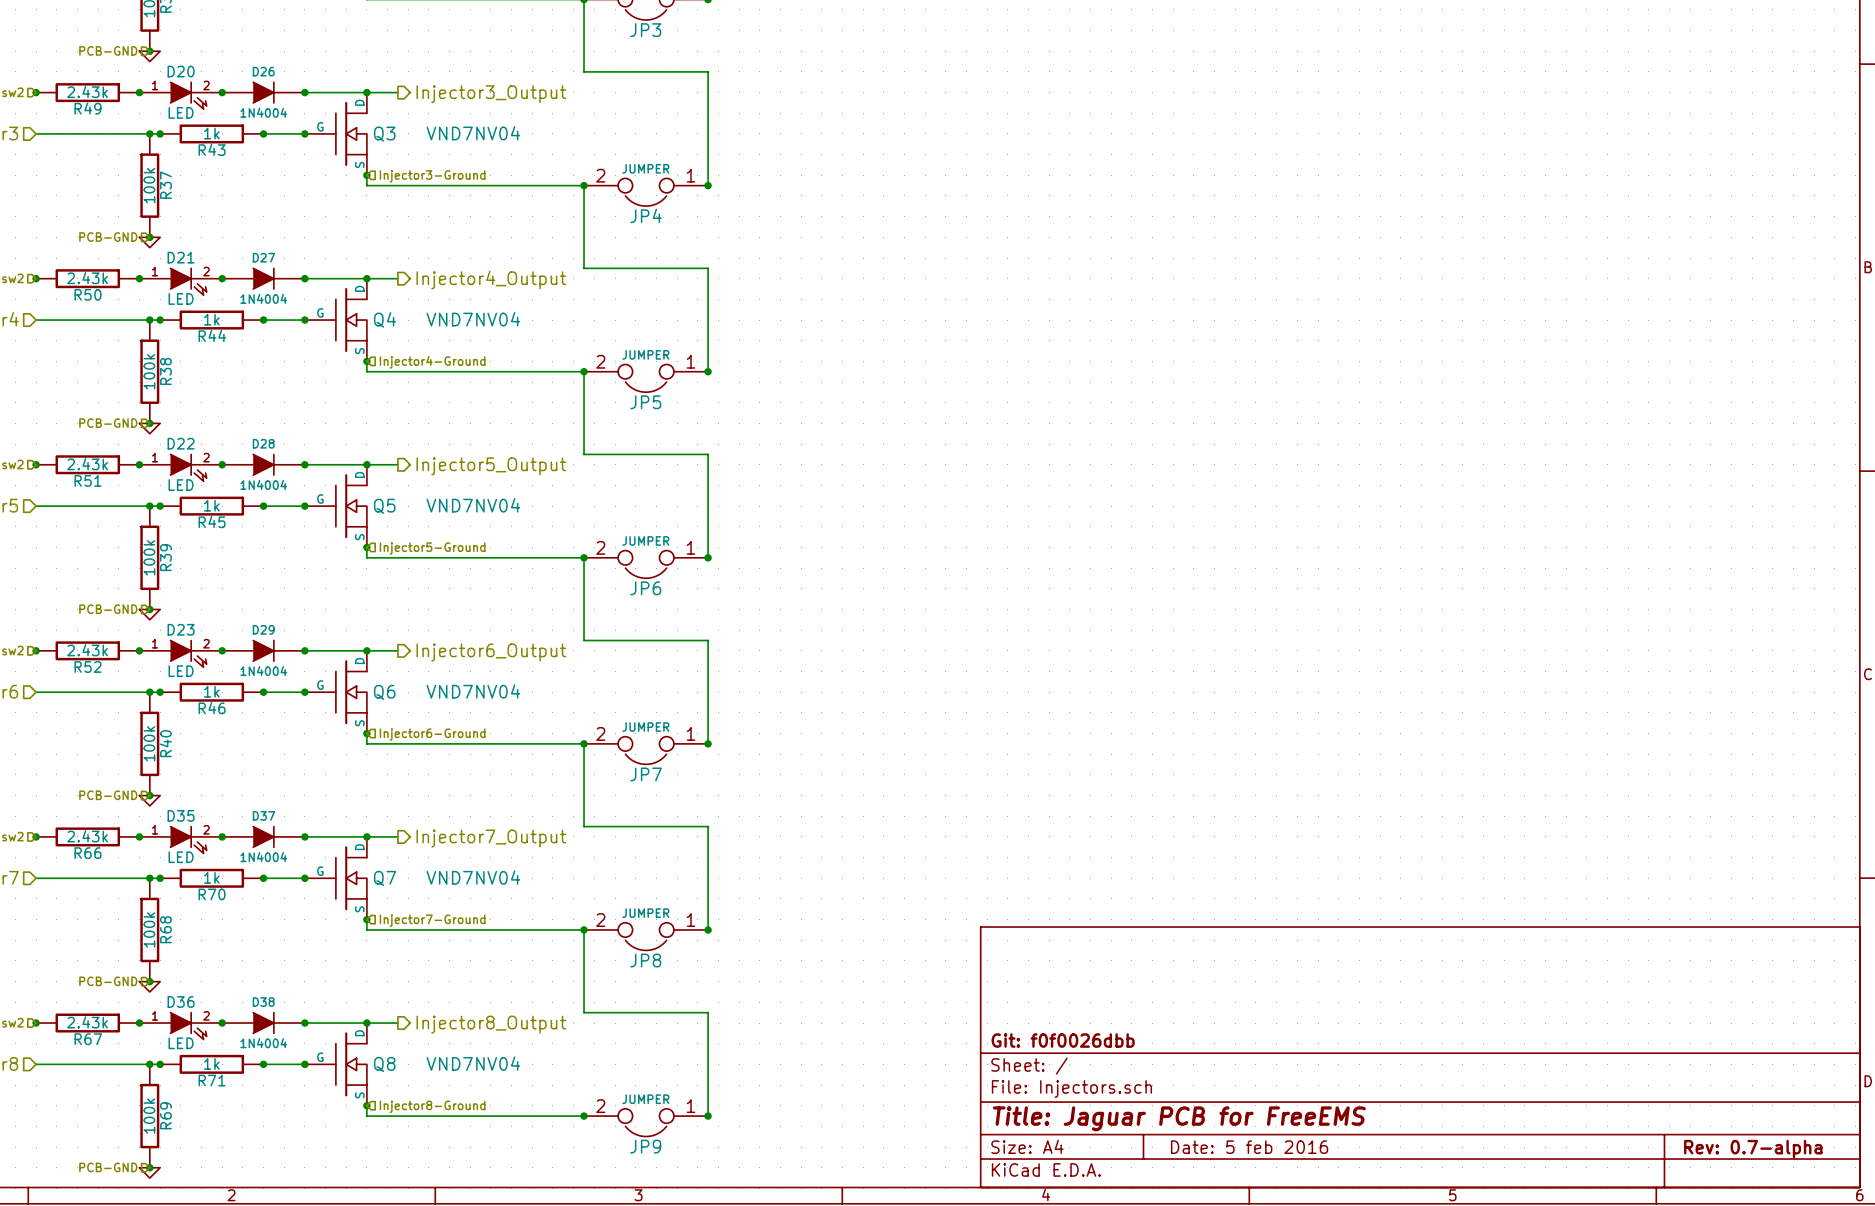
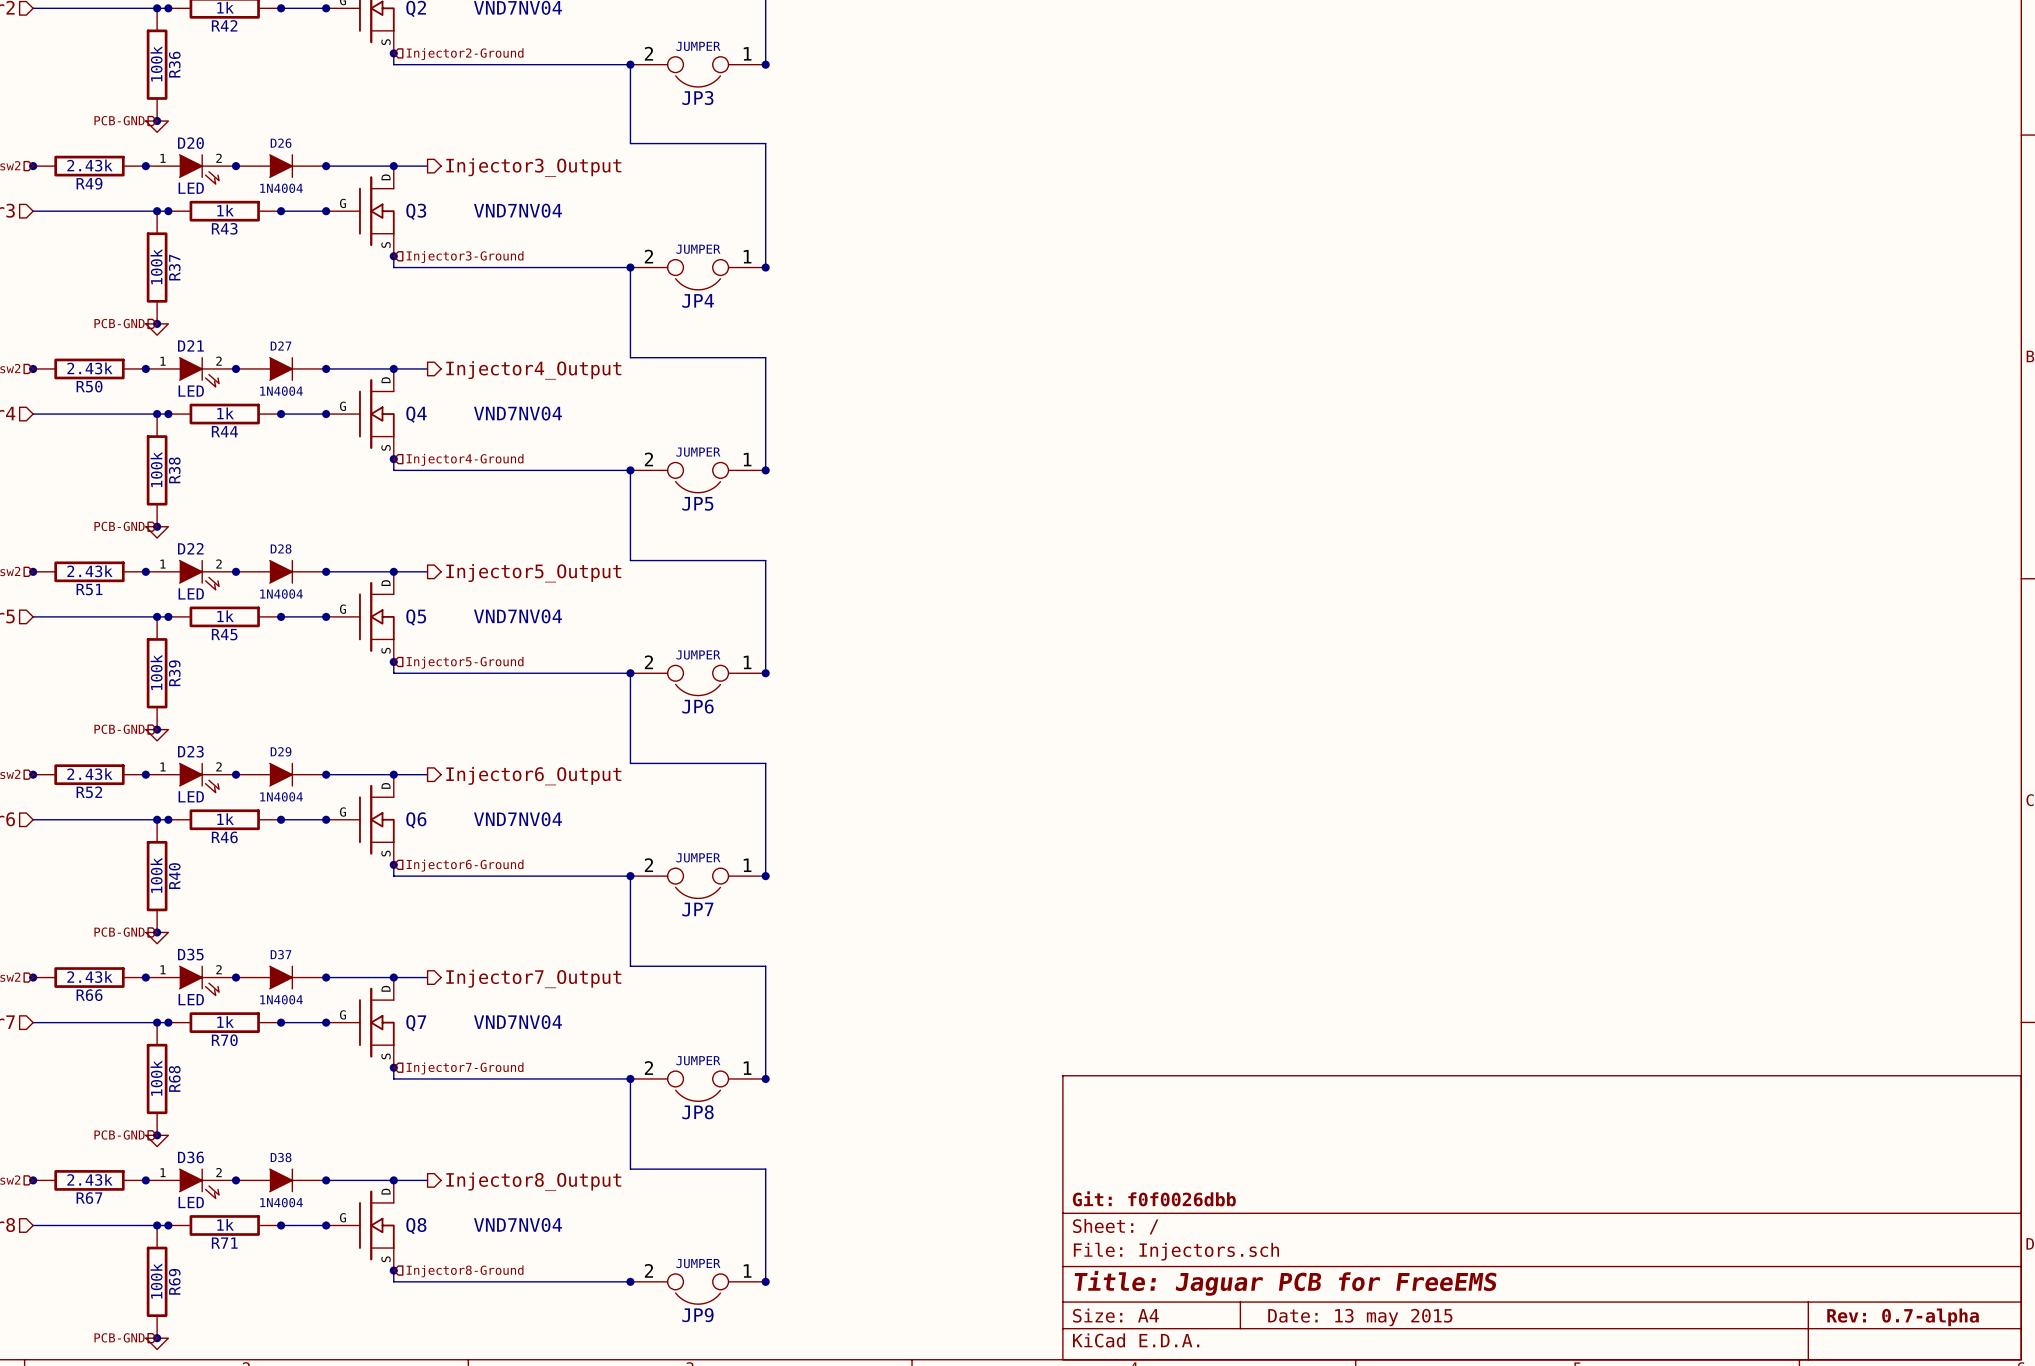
title block: Date: 5 feb 2016 (1249, 1147) -> Date: 13 may 2015 (1360, 1317)

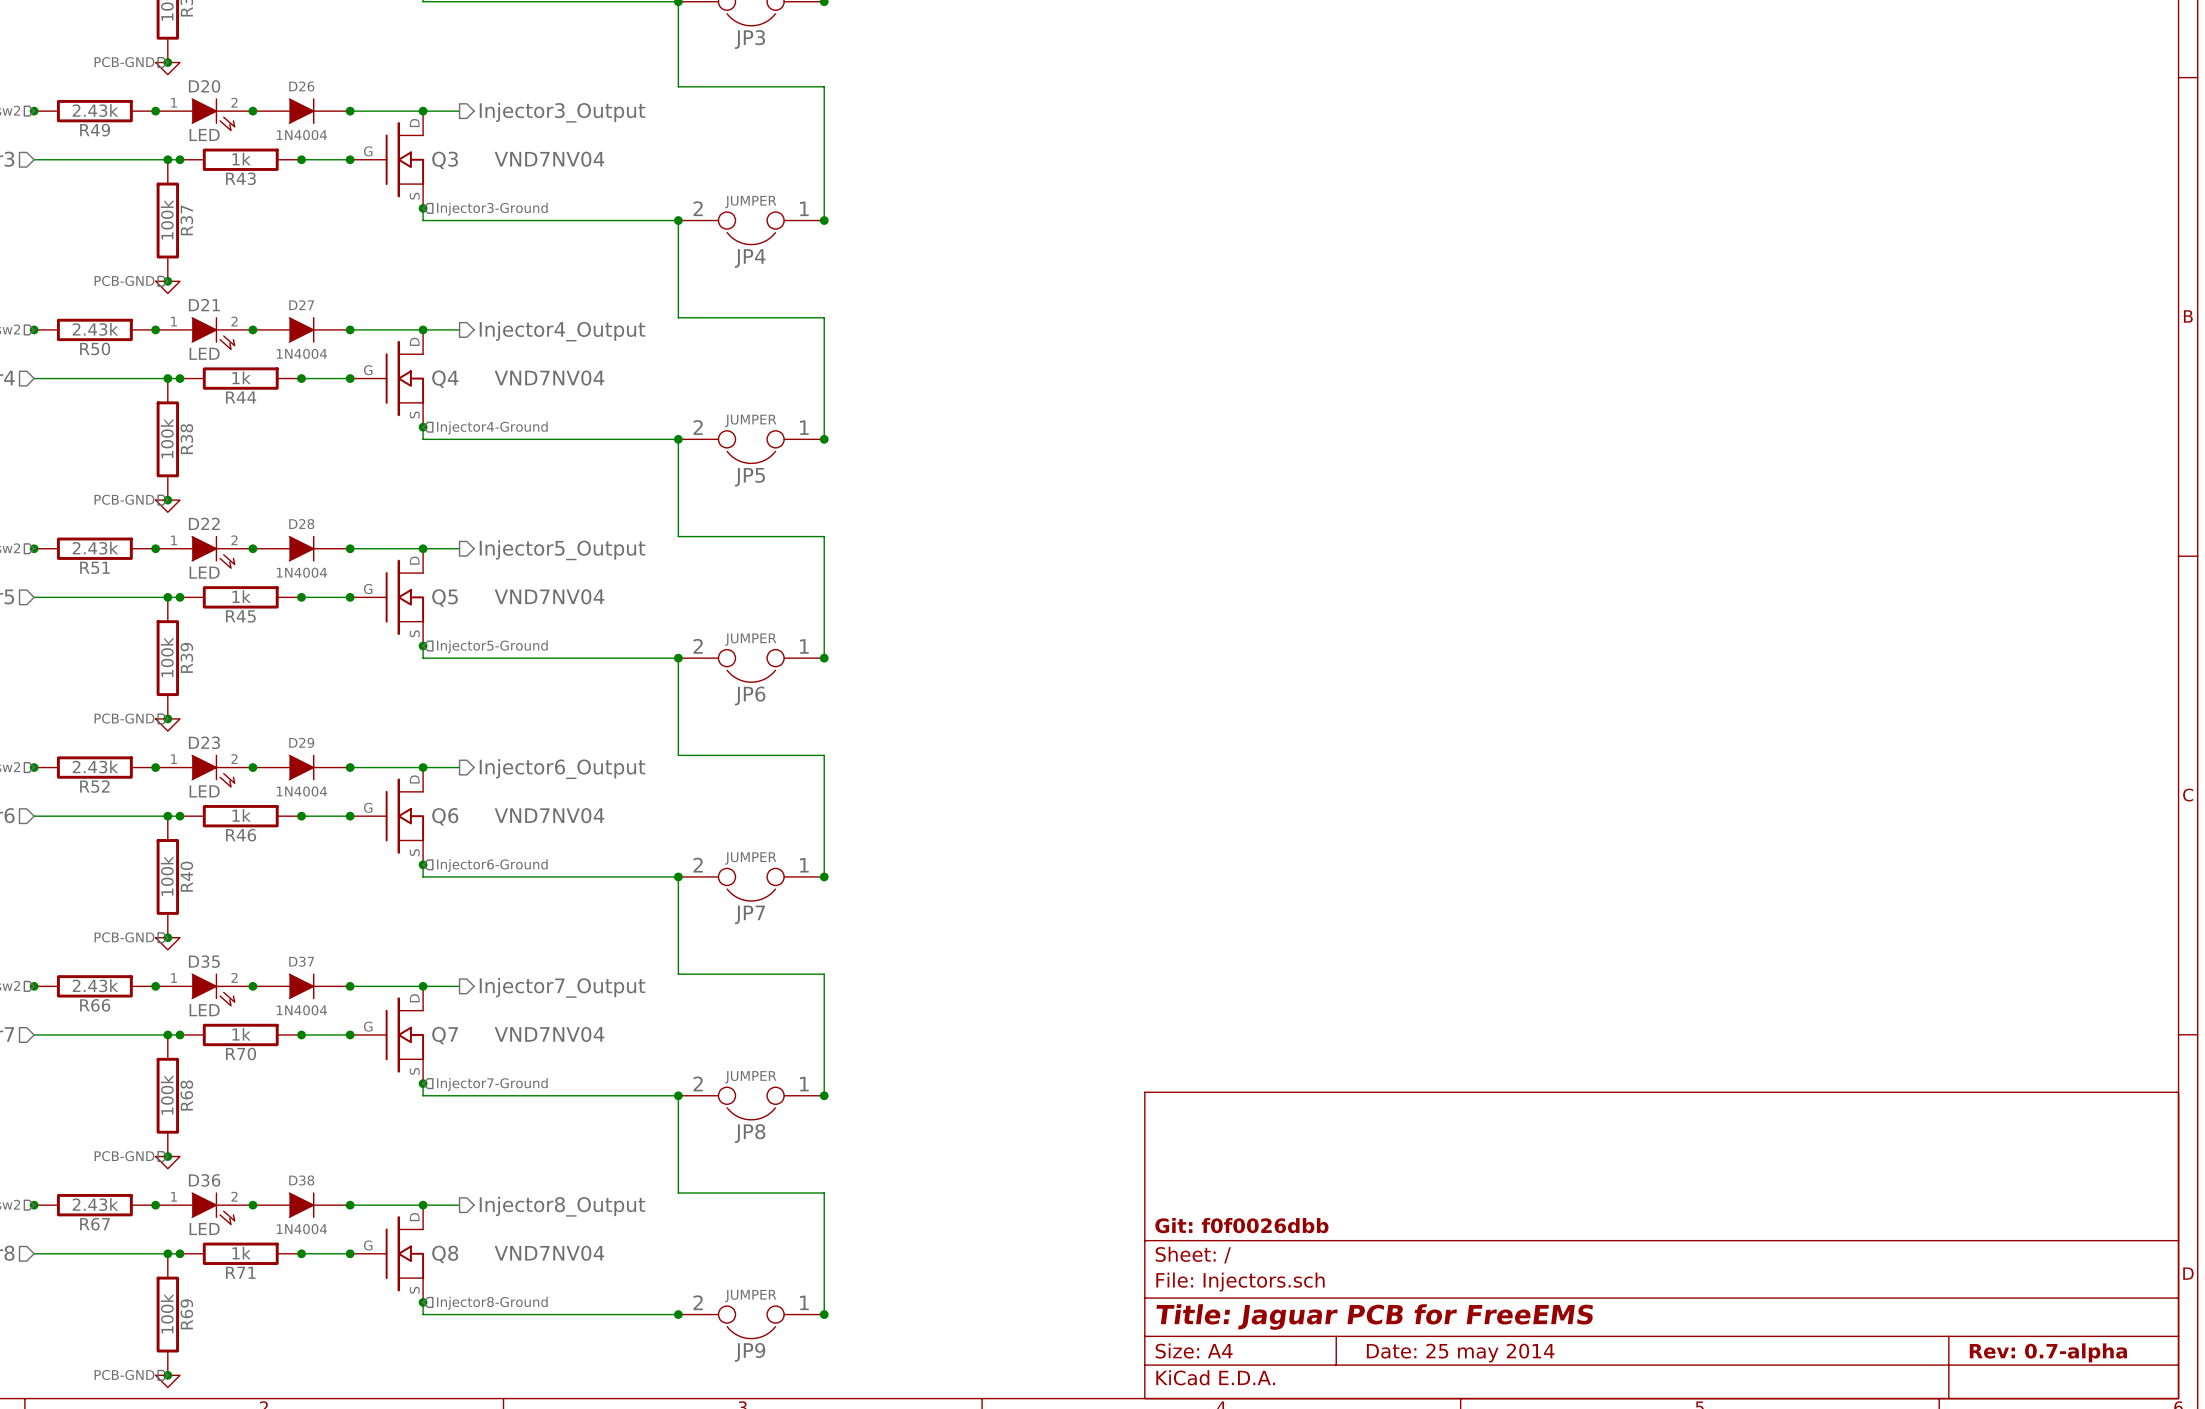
title block: Date: 13 may 2015 (1360, 1317) -> Date: 25 may 2014 (1460, 1353)

